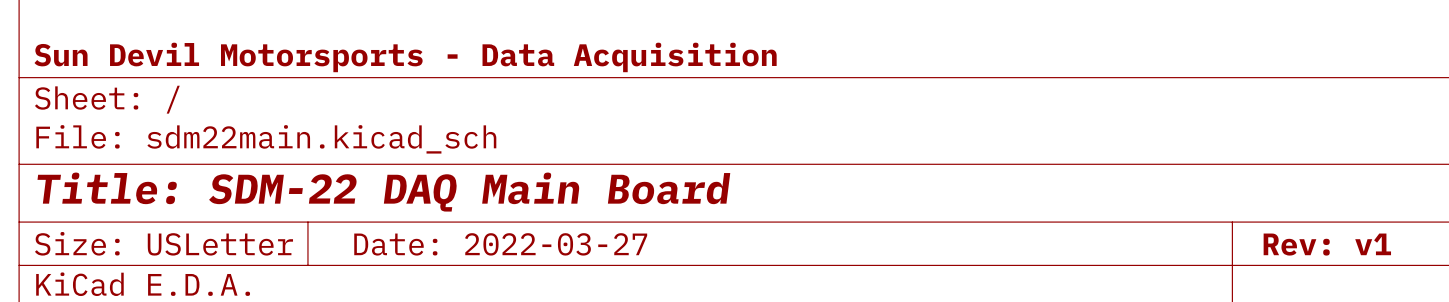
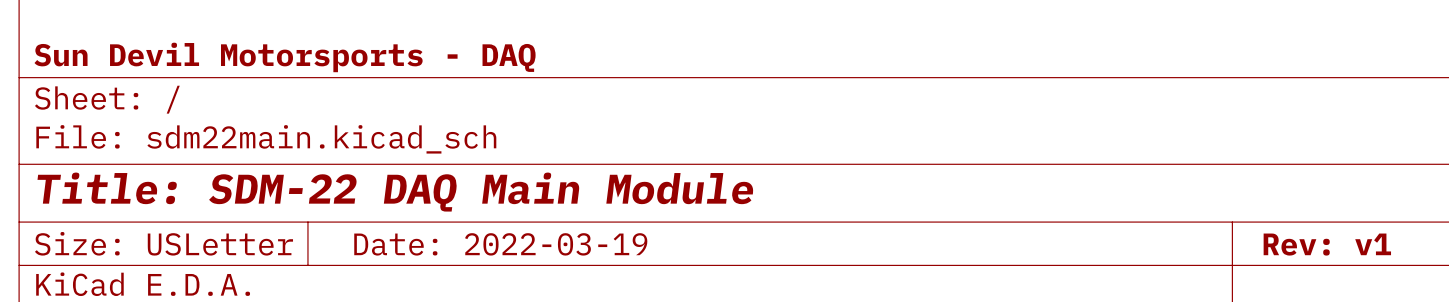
title block: Sun Devil Motorsports - Data Acquisition (405, 57) -> Sun Devil Motorsports - DAQ (285, 57)
title block: Title: SDM-22 DAQ Main Board (383, 192) -> Title: SDM-22 DAQ Main Module (395, 192)
title block: Date: 2022-03-27 (500, 244) -> Date: 2022-03-19 (500, 244)

